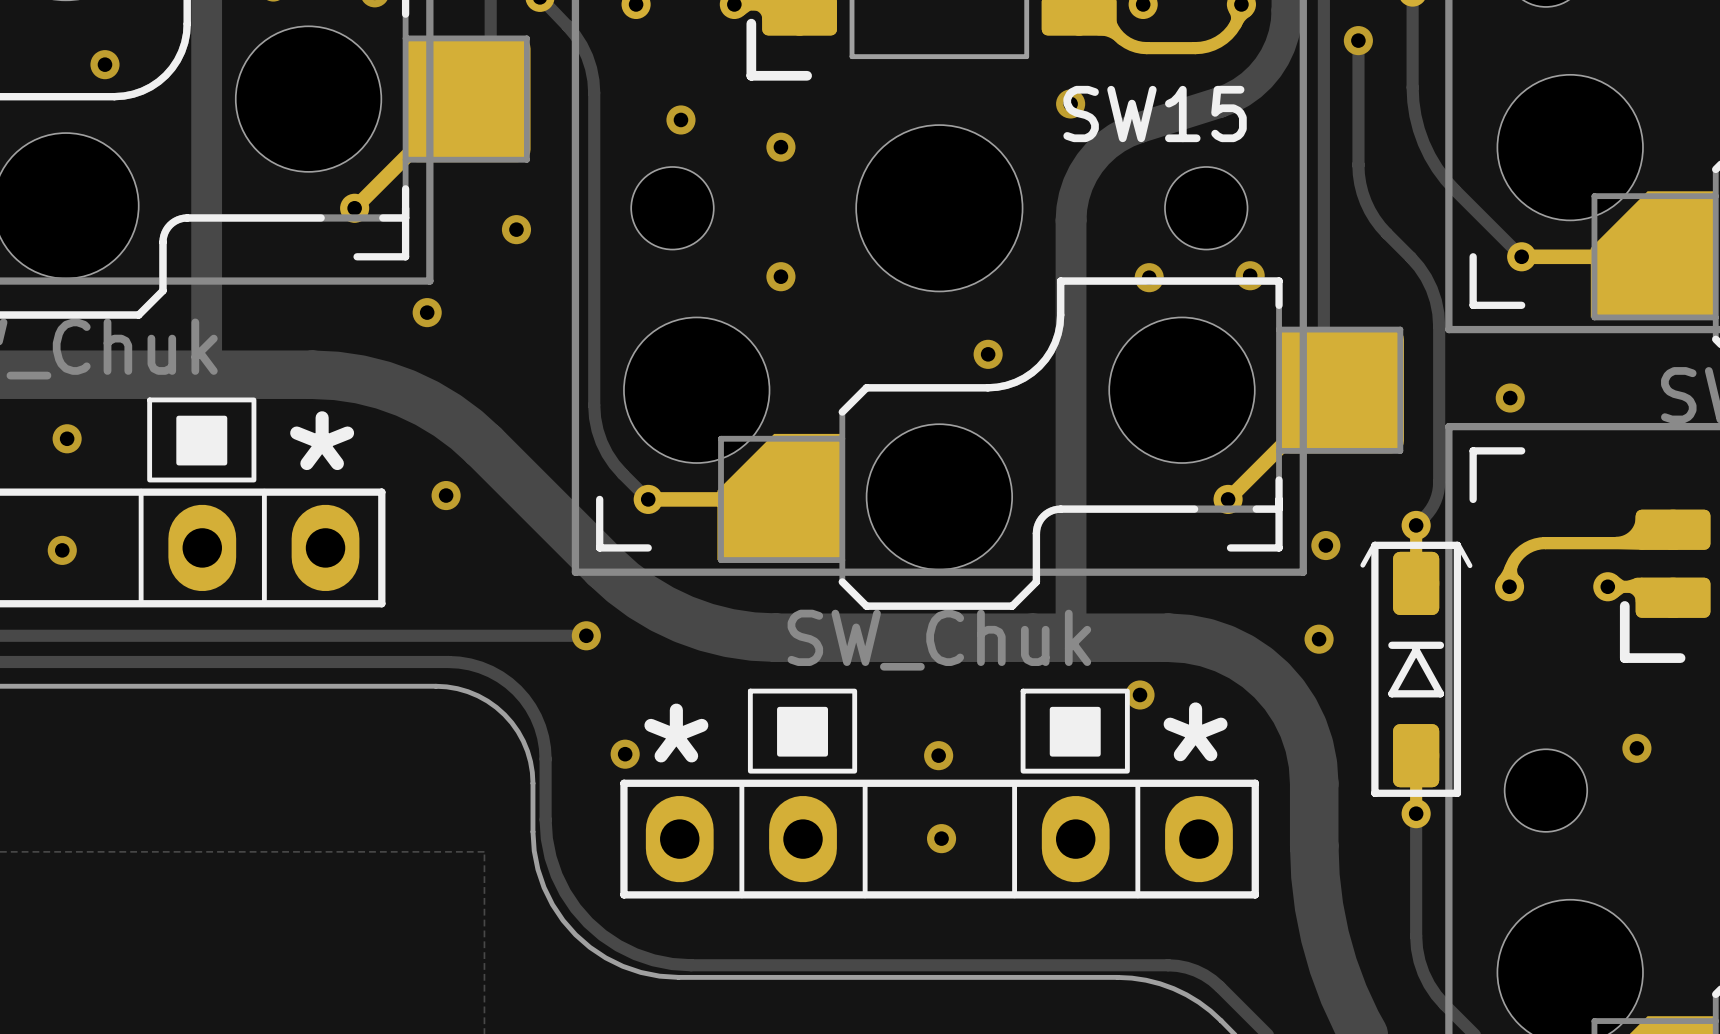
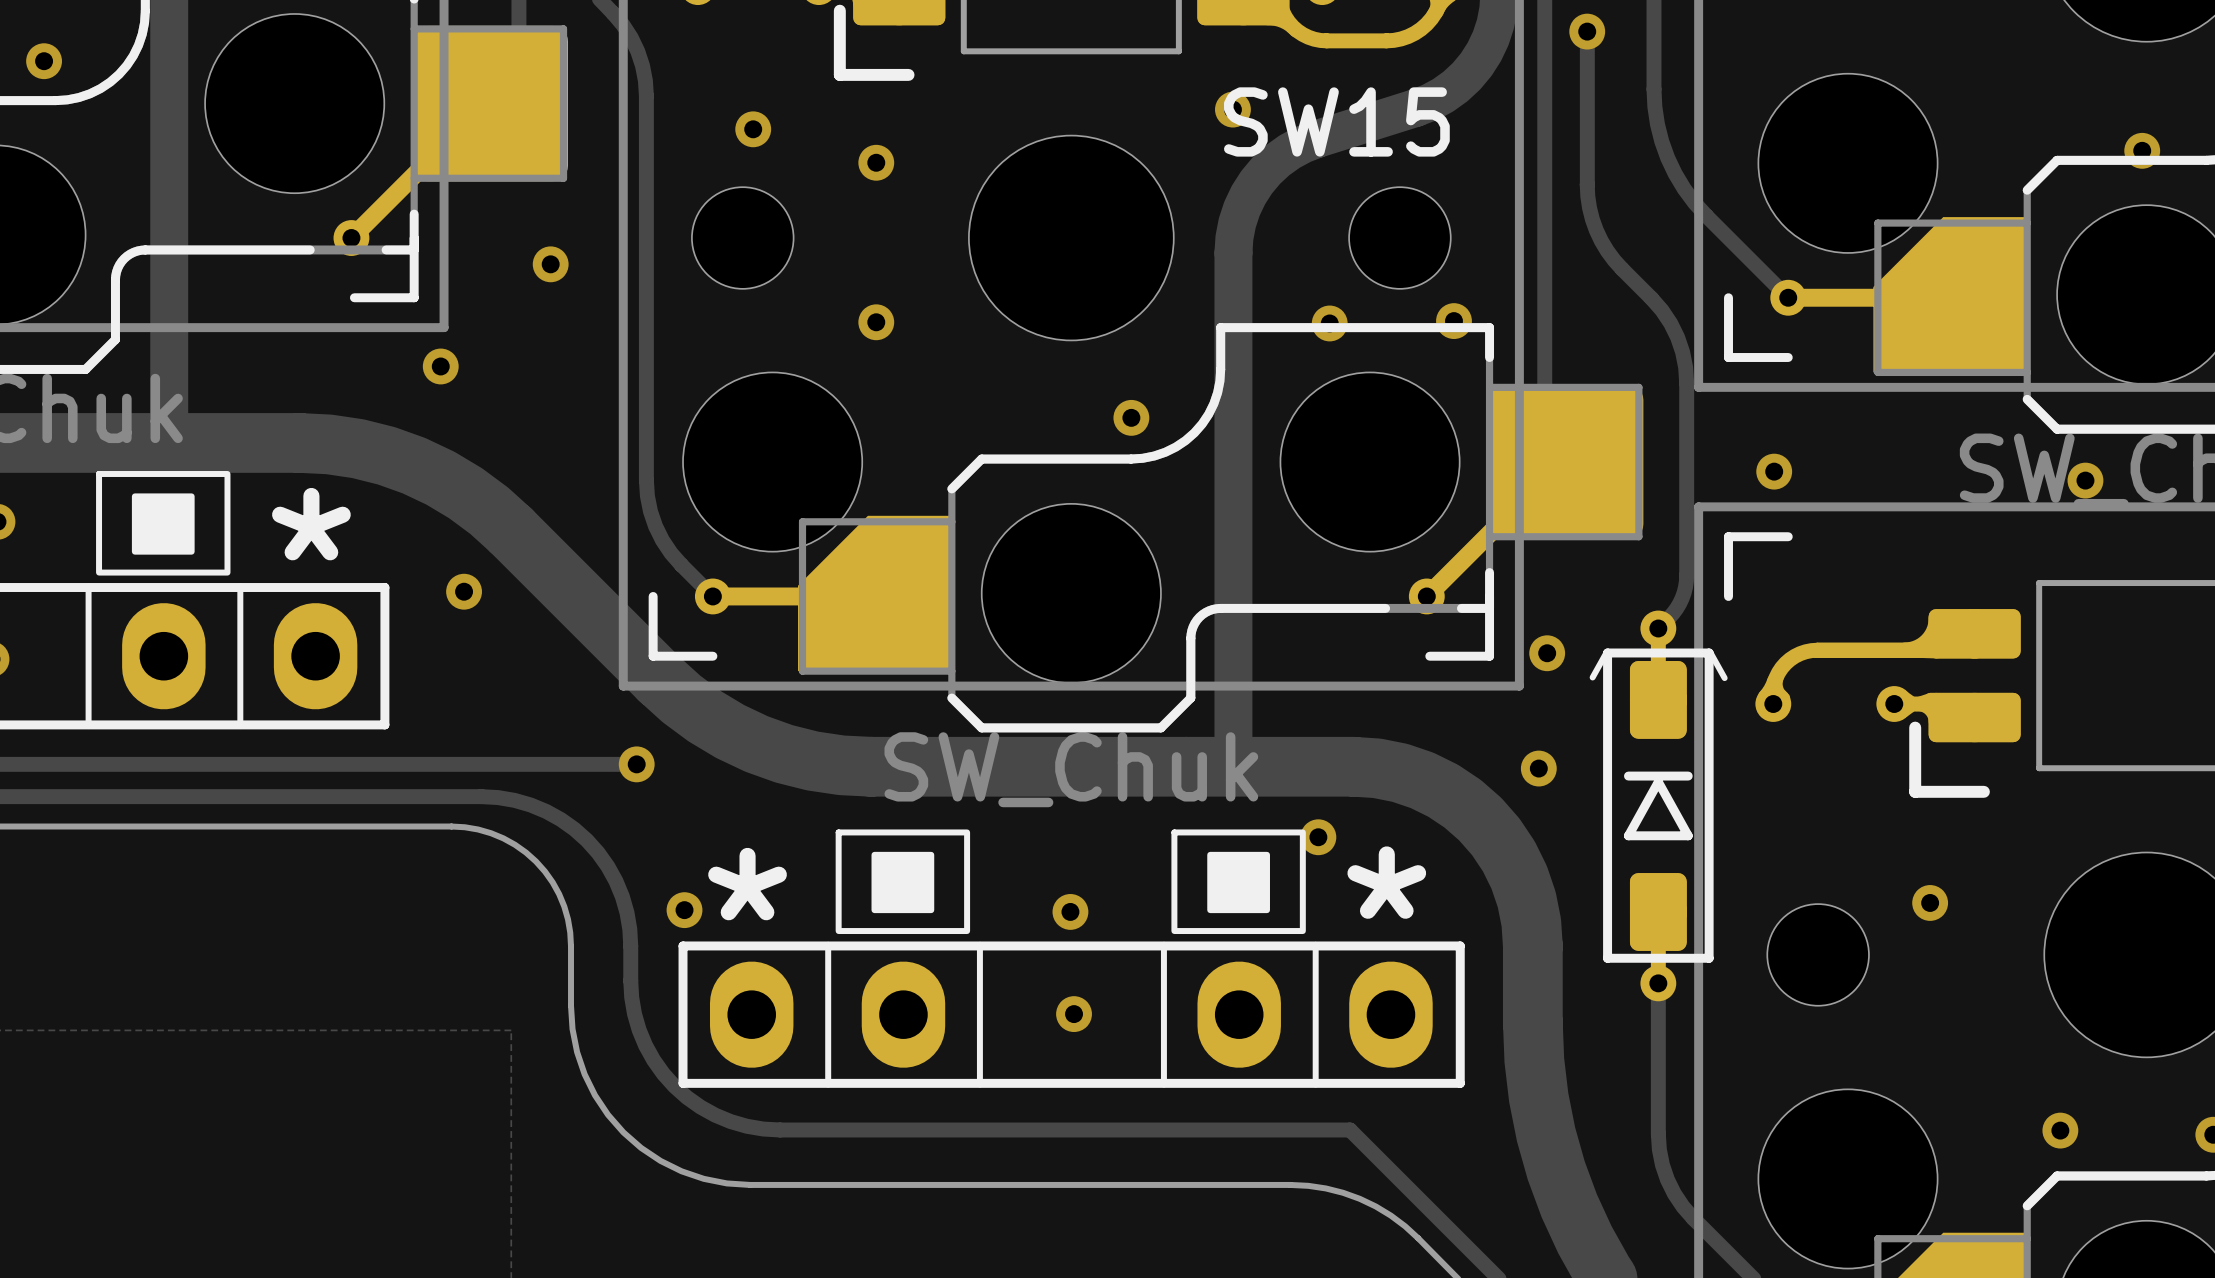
track: (448, 661) (470, 664) (500, 676) (517, 690) (530, 707) (540, 726) (544, 748) (546, 838) (556, 875) (565, 892) (588, 922) (618, 945) (635, 954) (653, 960) (691, 965) (1168, 965) (1195, 970) (1219, 986) -> (467, 796) (498, 797) (514, 800) (546, 811) (574, 829) (598, 852) (615, 881) (627, 912) (630, 945) (631, 997) (639, 1029) (645, 1045) (663, 1073) (674, 1086) (700, 1107) (715, 1115) (746, 1126) (780, 1129) (1350, 1129) (1416, 1196)

